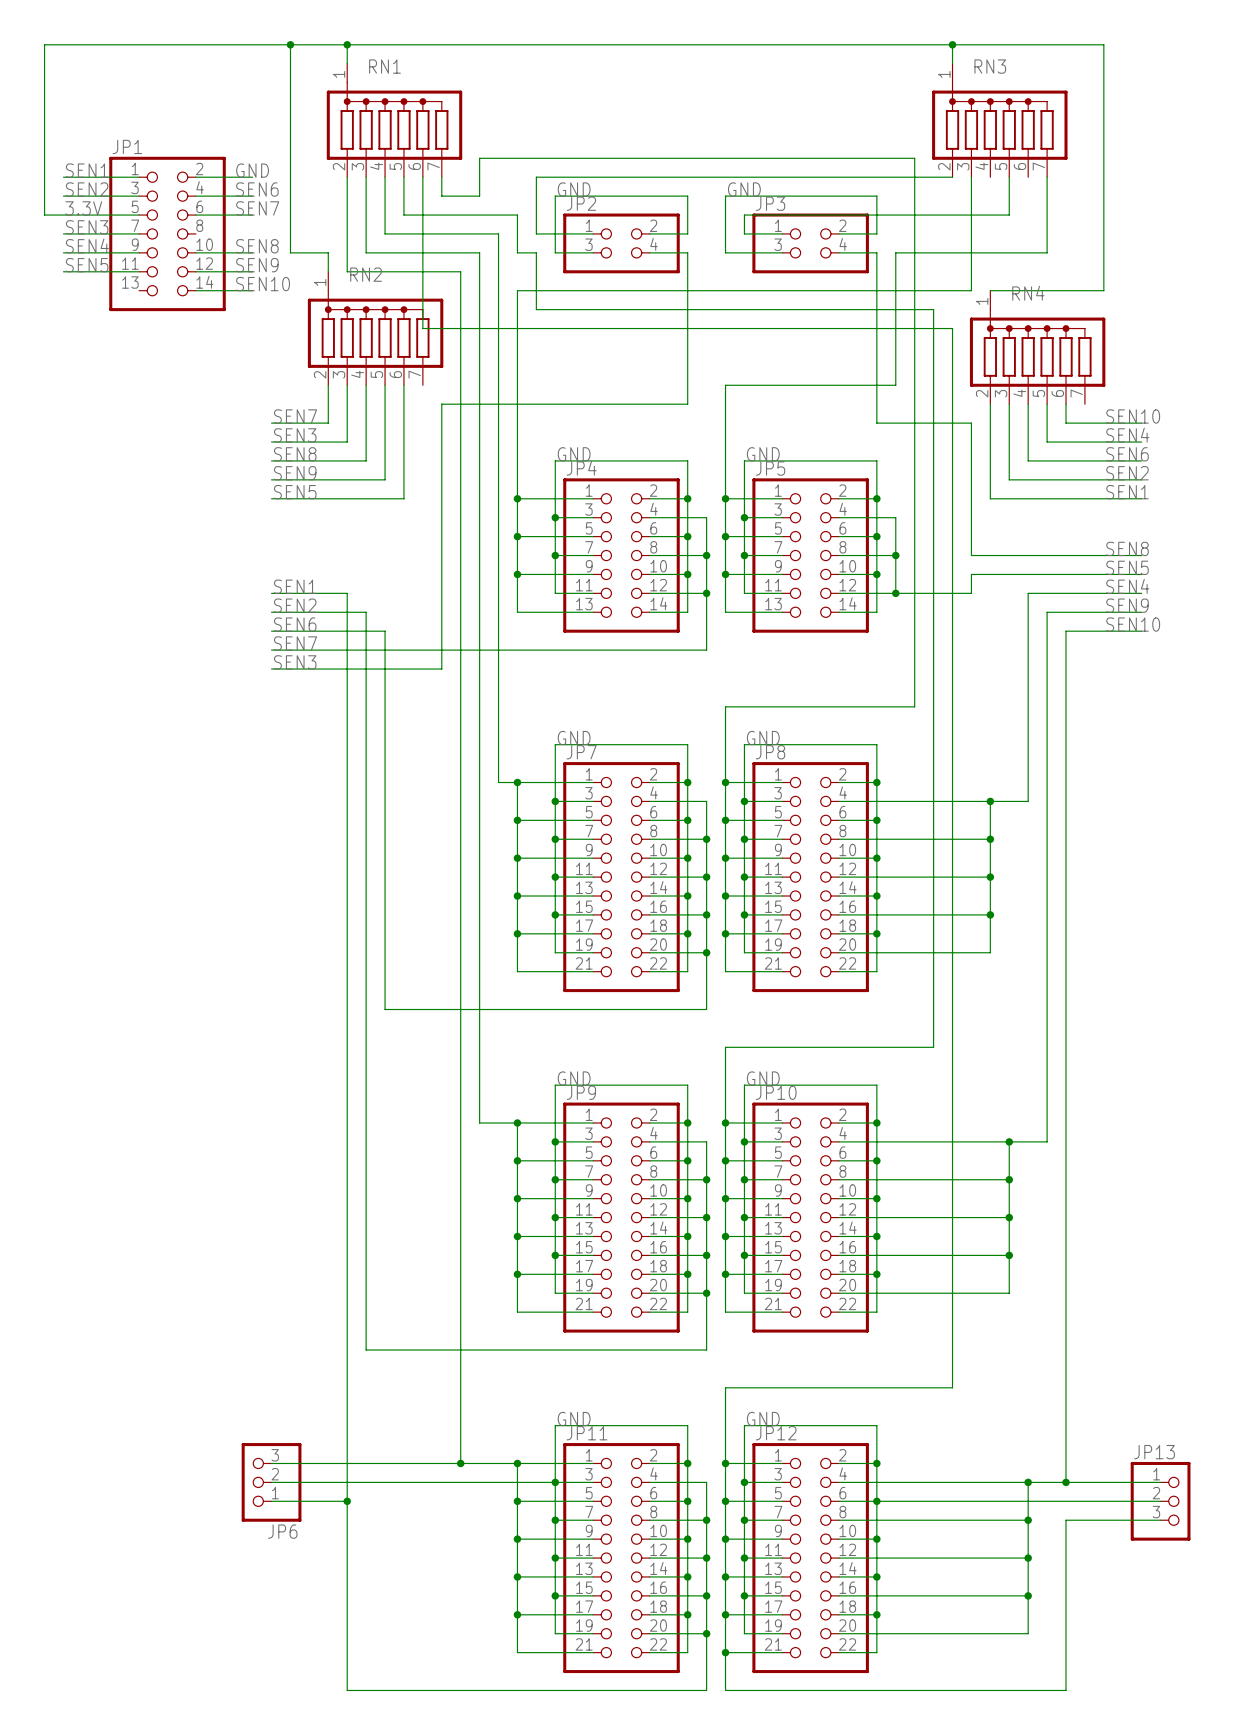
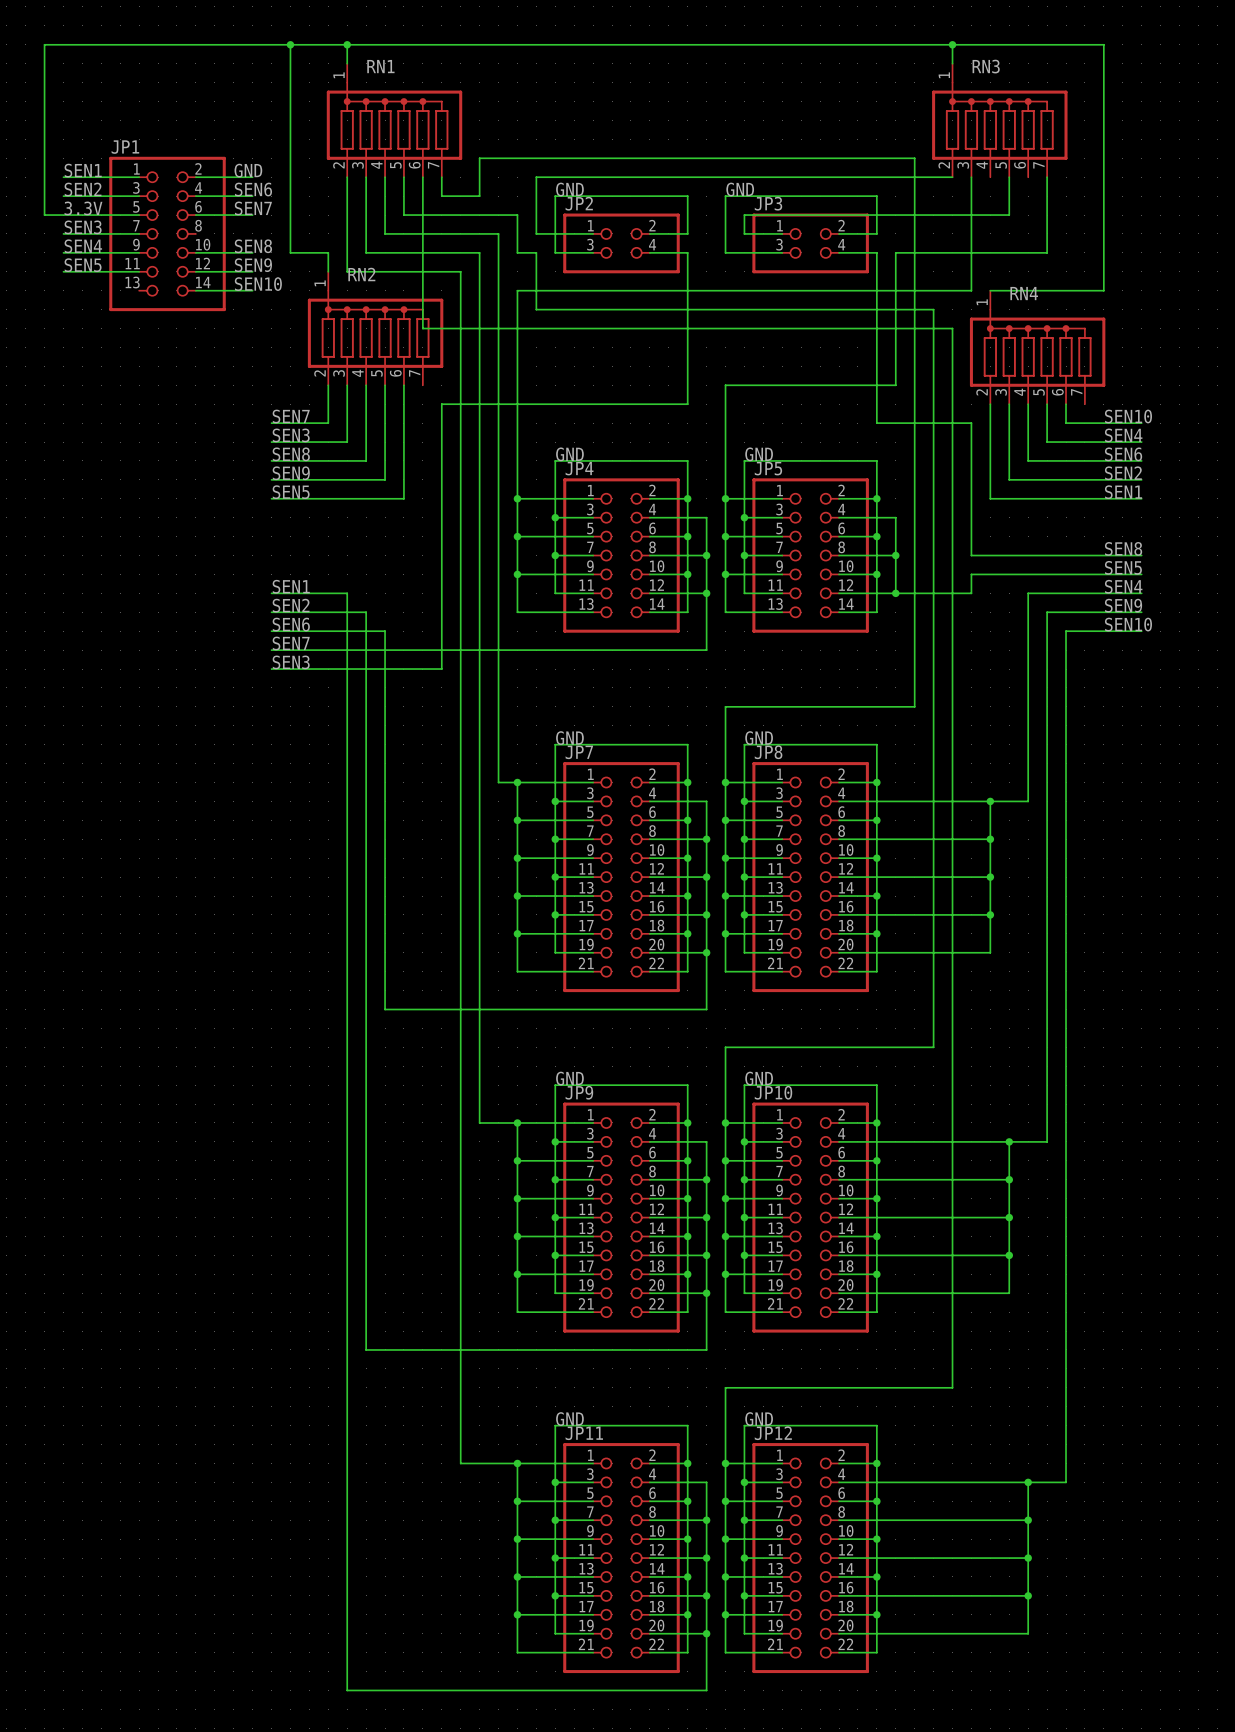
wire: (271, 1463) (460, 1463) -> none
junction: (460, 1463) -> none
wire: (271, 1482) (555, 1482) -> none
JP6: (271, 1482) -> none
wire: (1066, 1482) (1160, 1482) -> none
junction: (1066, 1482) -> none
wire: (271, 1501) (347, 1501) -> none
junction: (347, 1501) -> none
wire: (876, 1501) (1160, 1501) -> none
JP13: (1160, 1501) -> none
wire: (1160, 1520) (1066, 1520) (1066, 1690) (725, 1690) (725, 1652) -> none
junction: (725, 1652) -> none

